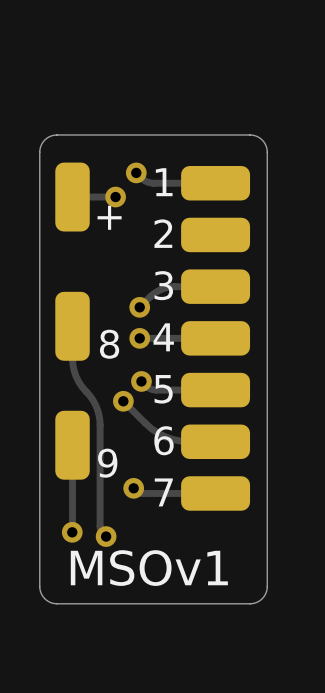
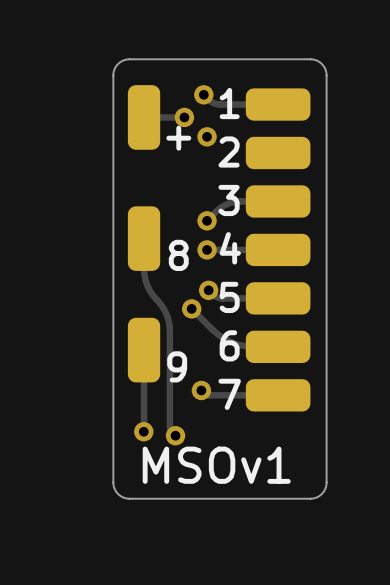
via: none -> (207, 136)

